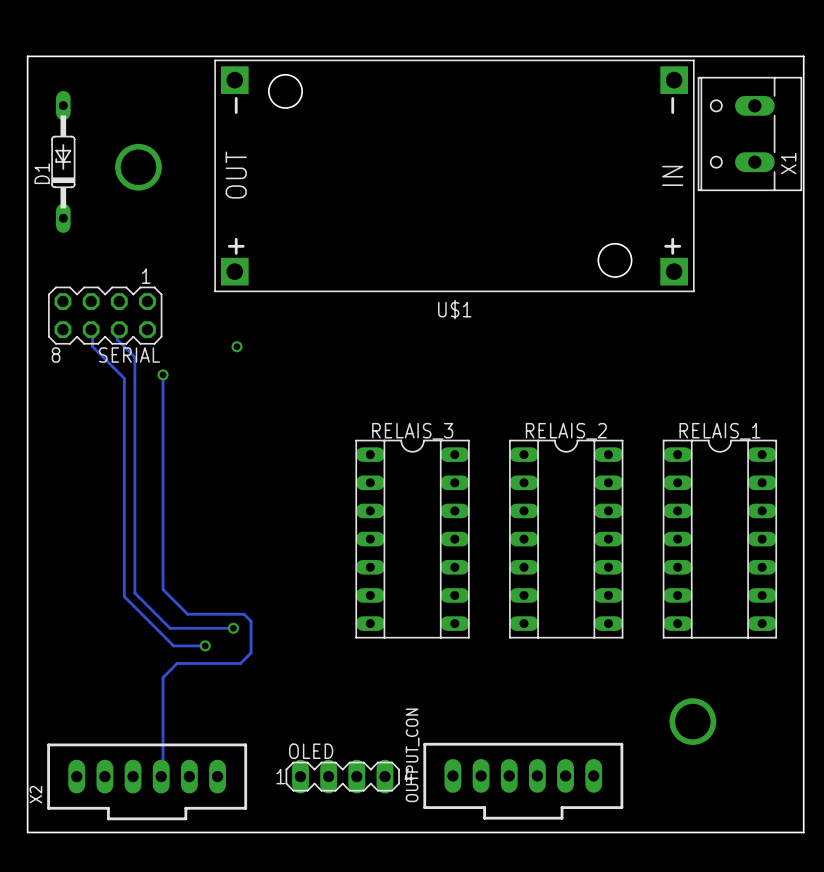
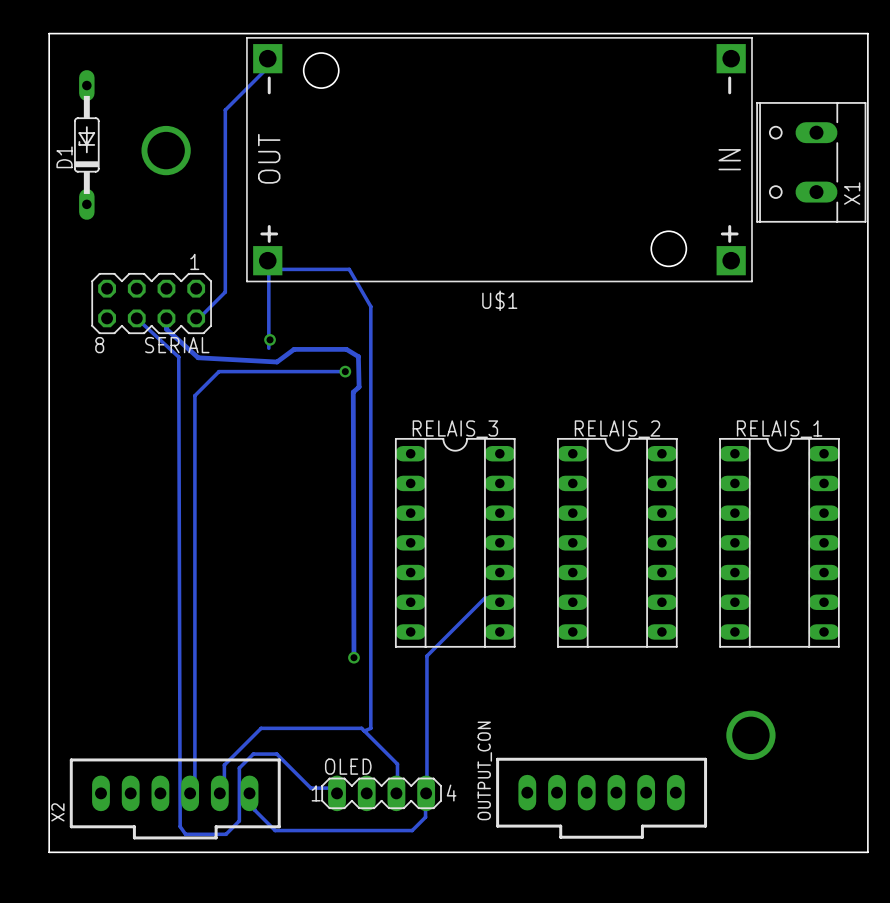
track: none -> (268, 66) (225, 110) (225, 292) (199, 318) (196, 318)
X1 position: (749, 133) -> (811, 162)
track: none -> (268, 268) (349, 269) (370, 306) (370, 728) (364, 731)
track: none -> (268, 268) (268, 348)
SERIAL position: (105, 315) -> (151, 303)
track: none -> (136, 318) (178, 357) (180, 826) (185, 834) (226, 834) (239, 820) (239, 768) (253, 754) (276, 754) (310, 788) (338, 788)
track: none -> (166, 318) (166, 329) (198, 357) (277, 362) (294, 349) (346, 349) (358, 356) (359, 387) (353, 392) (353, 657)
track: (91, 329) (92, 346) (124, 378) (124, 596) (173, 645) (205, 645) -> none
track: (119, 329) (117, 331) (117, 339) (134, 357) (134, 593) (170, 628) (233, 628) -> none
track: (163, 374) (163, 589) (187, 614) (244, 614) (251, 621) (251, 652) (240, 663) (177, 663) (163, 677) (163, 774) (161, 776) -> none
via: (163, 374) -> none
track: none -> (345, 371) (219, 371) (194, 395) (195, 788)
via: none -> (345, 371)
track: none -> (485, 597) (426, 656) (426, 790)
via: (233, 628) -> none
via: (205, 645) -> none
via: none -> (353, 657)
track: none -> (397, 788) (397, 764) (361, 728) (261, 728) (224, 765) (224, 788)
track: none -> (427, 788) (425, 789) (425, 817) (412, 830) (275, 830) (254, 809) (254, 788)
OUTPUT_CON position: (523, 781) -> (601, 798)

